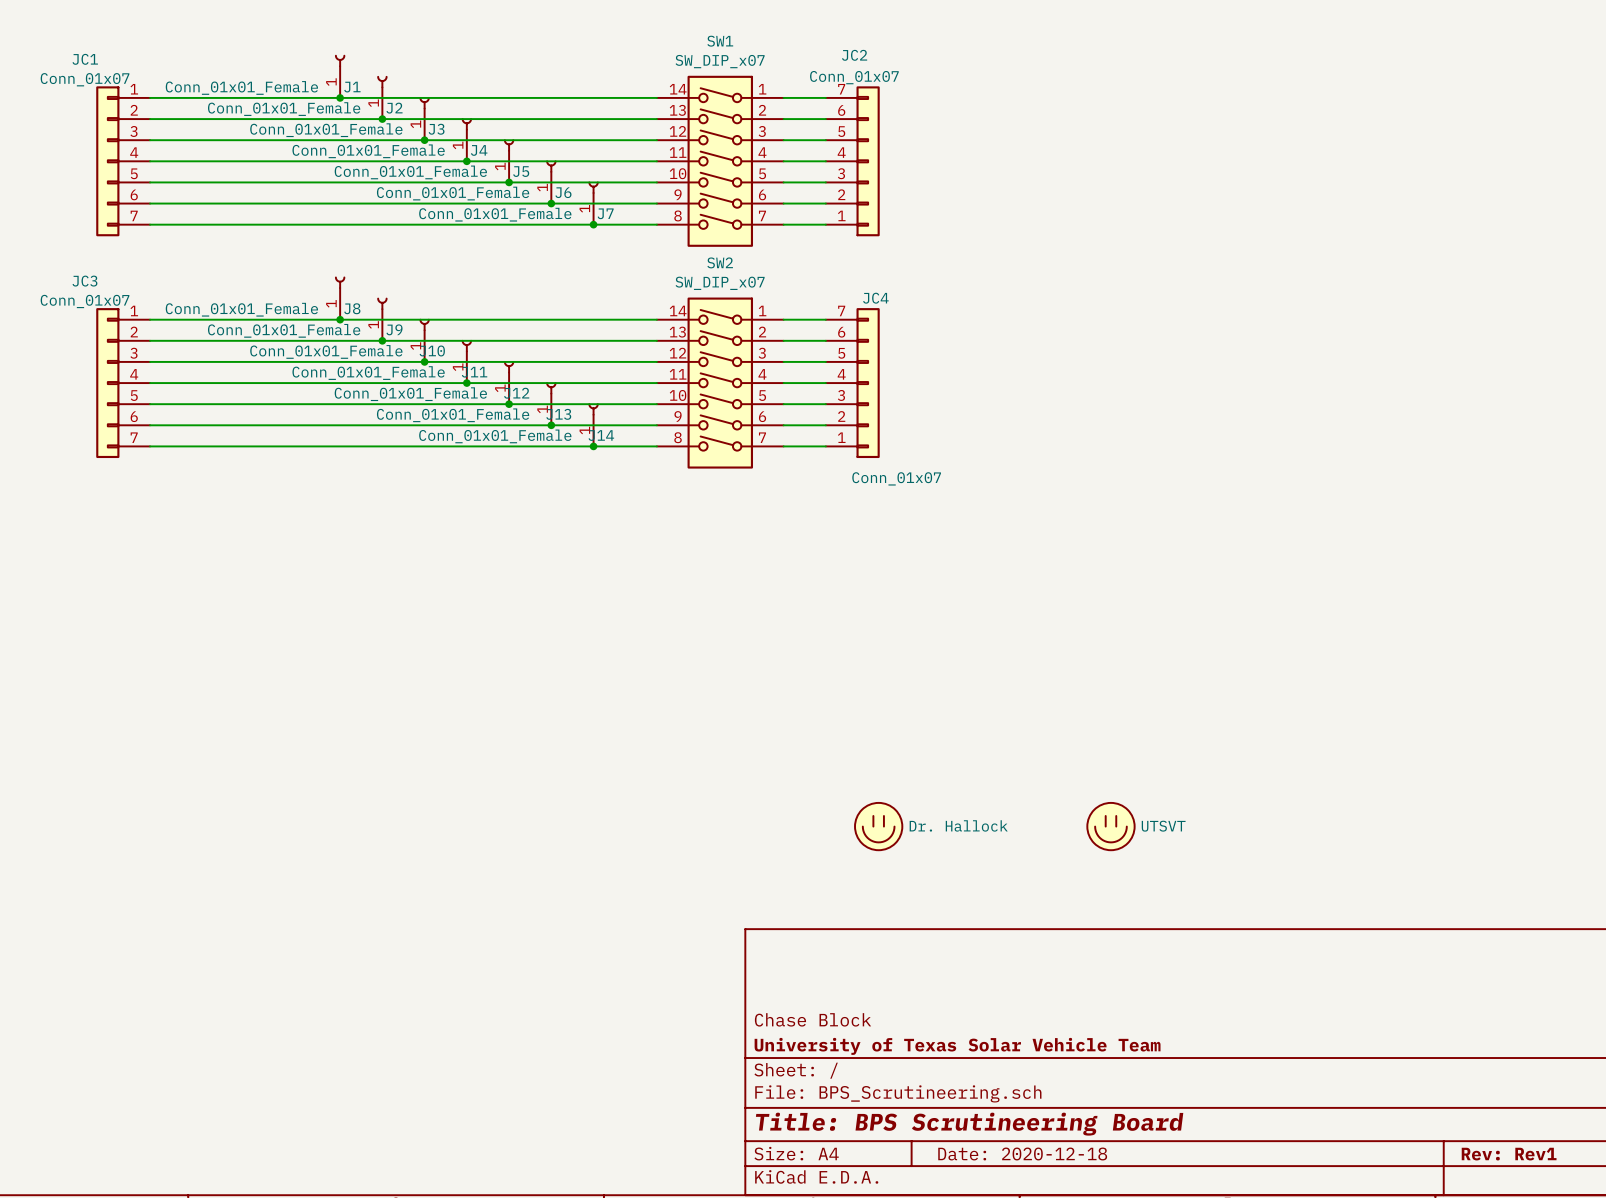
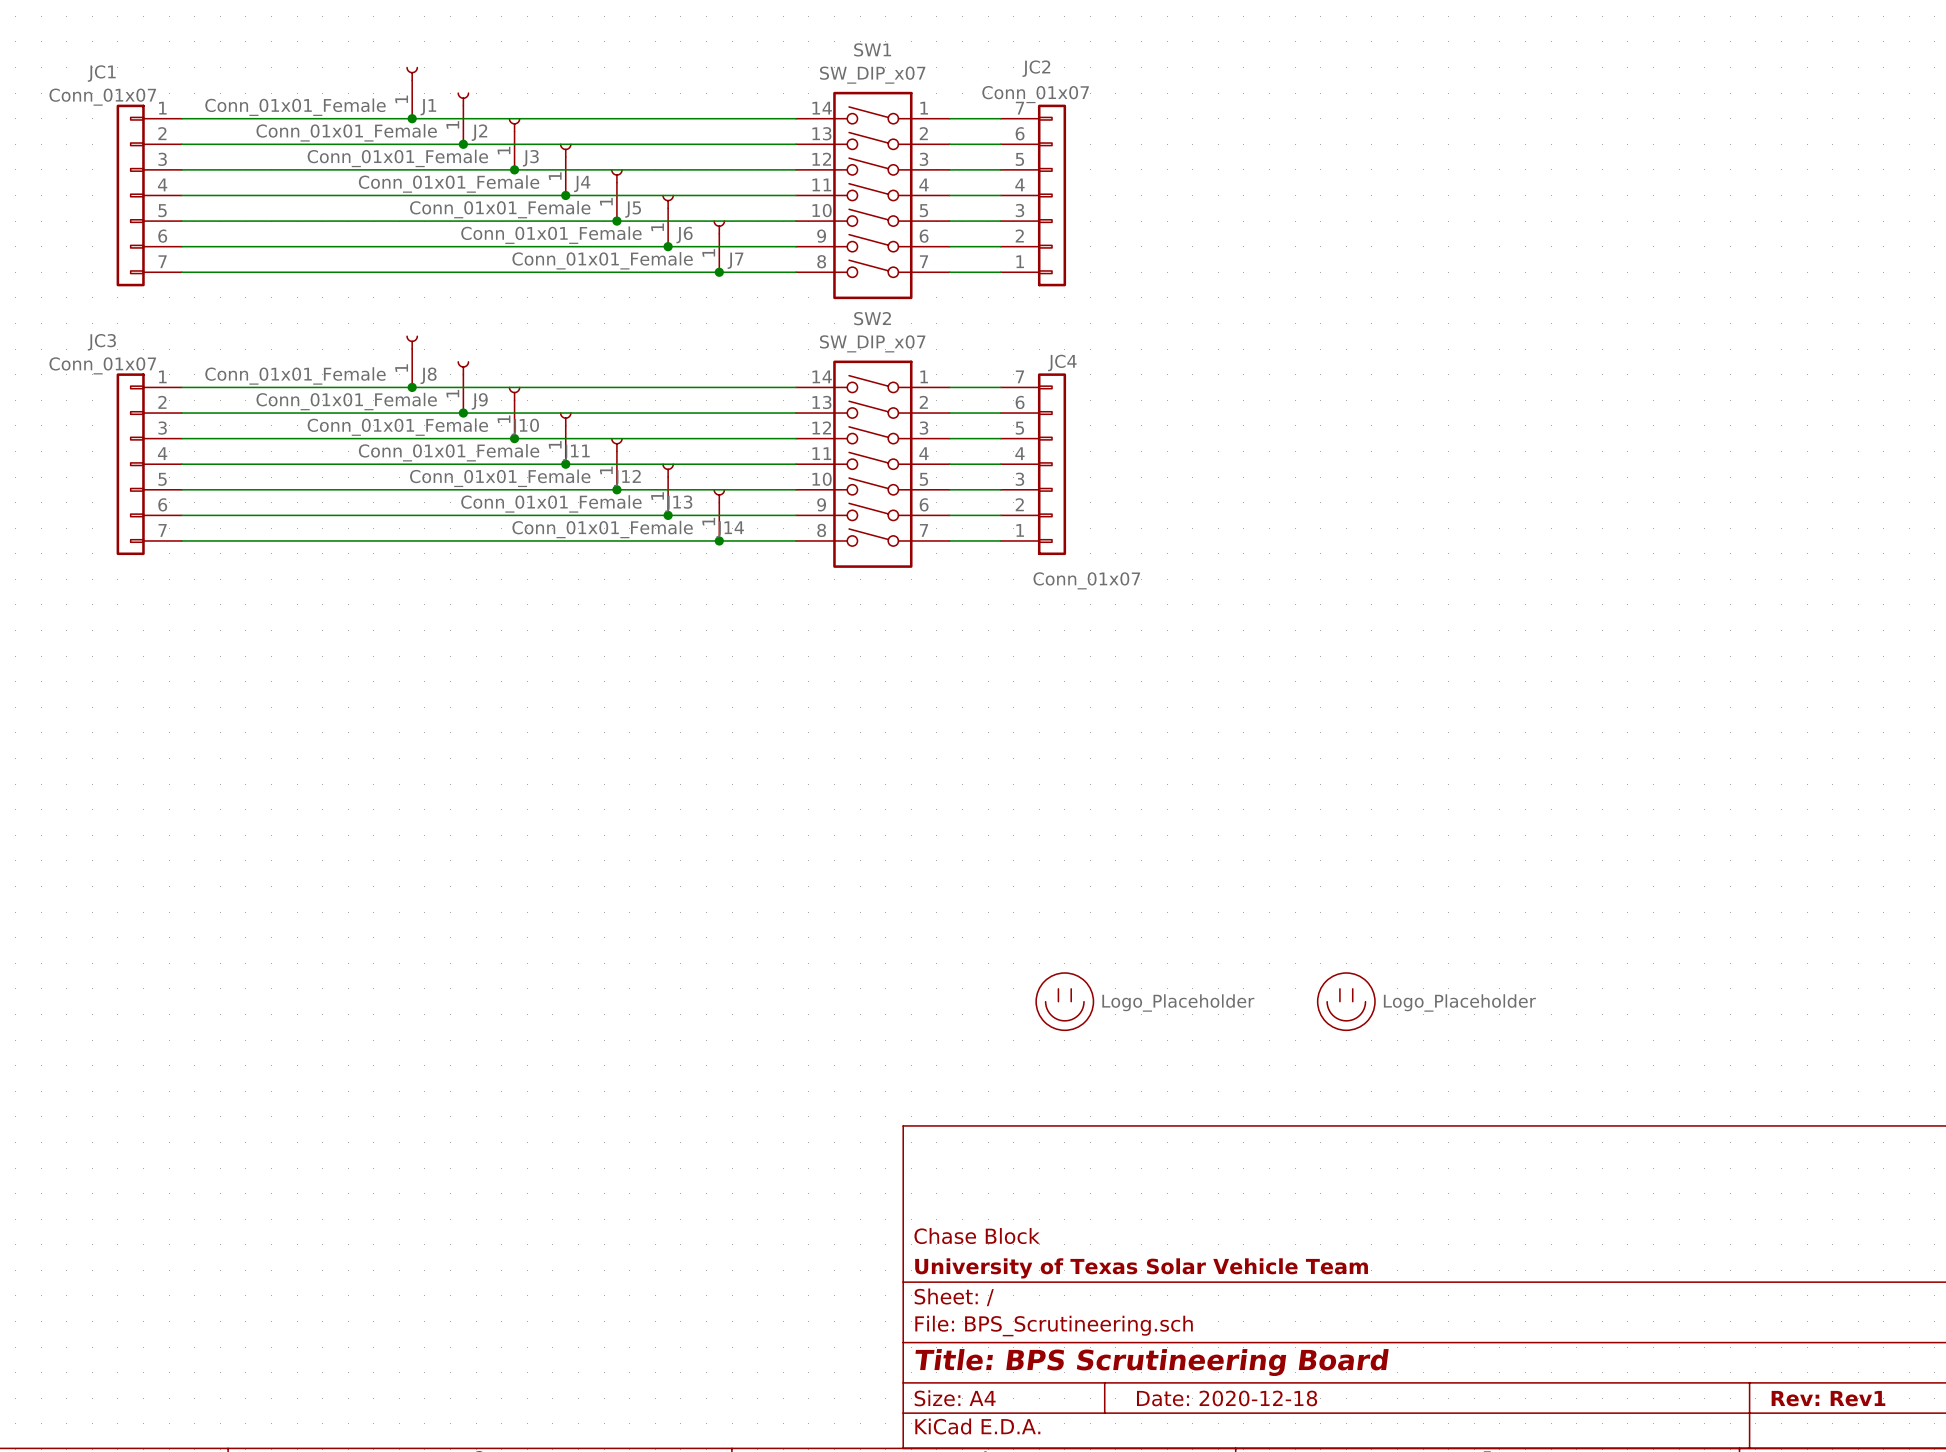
part value: Dr. Hallock (958, 825) -> Logo_Placeholder (1178, 1002)
part value: UTSVT (1163, 826) -> Logo_Placeholder (1459, 1002)

